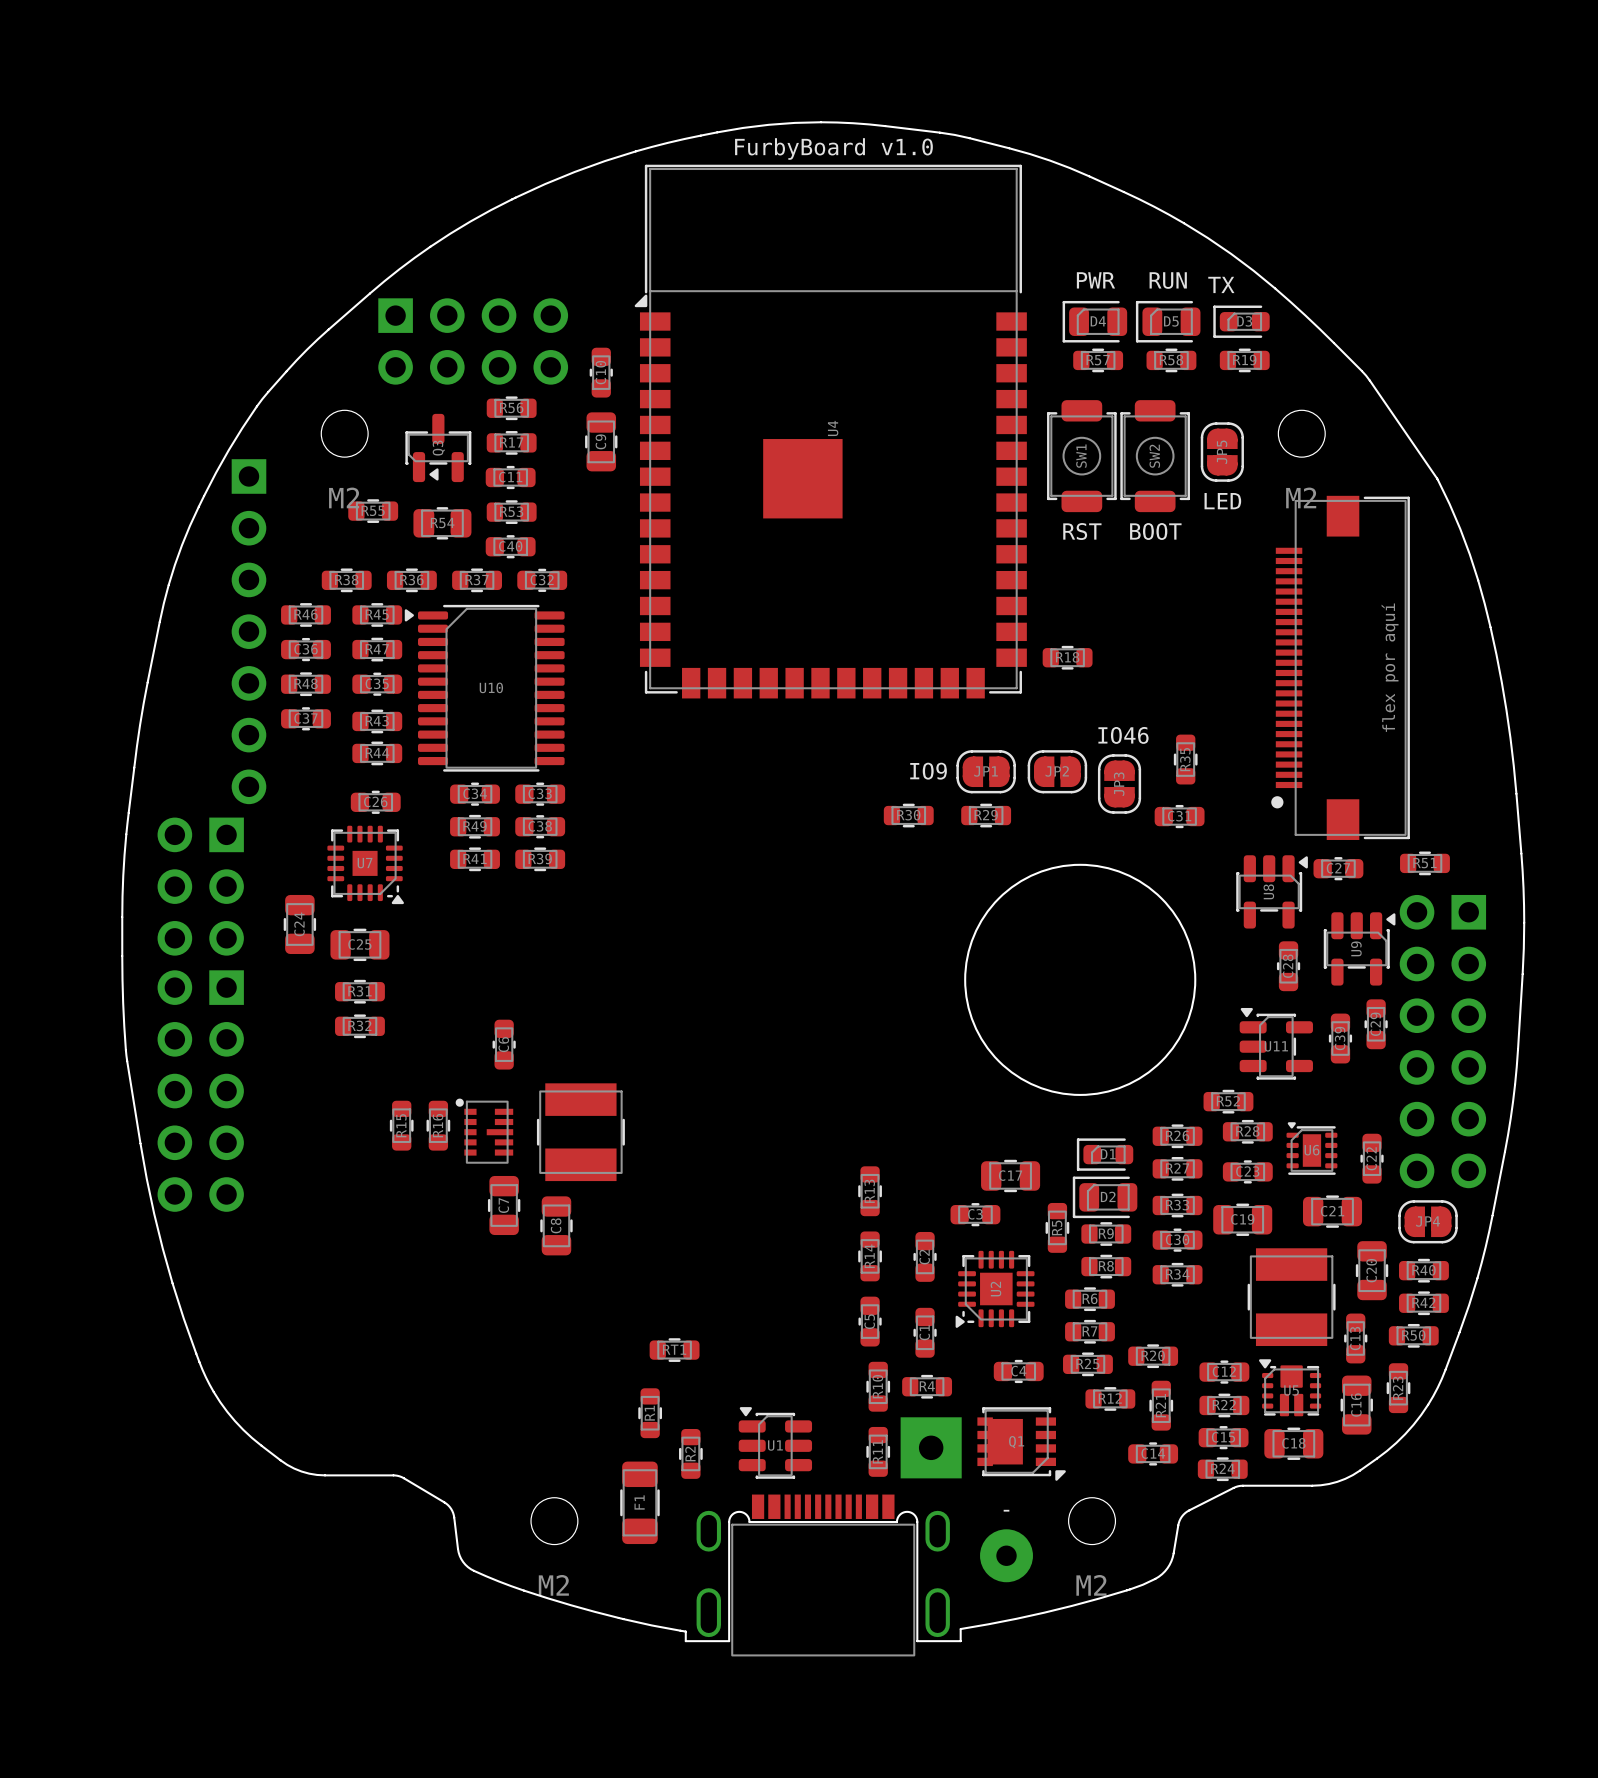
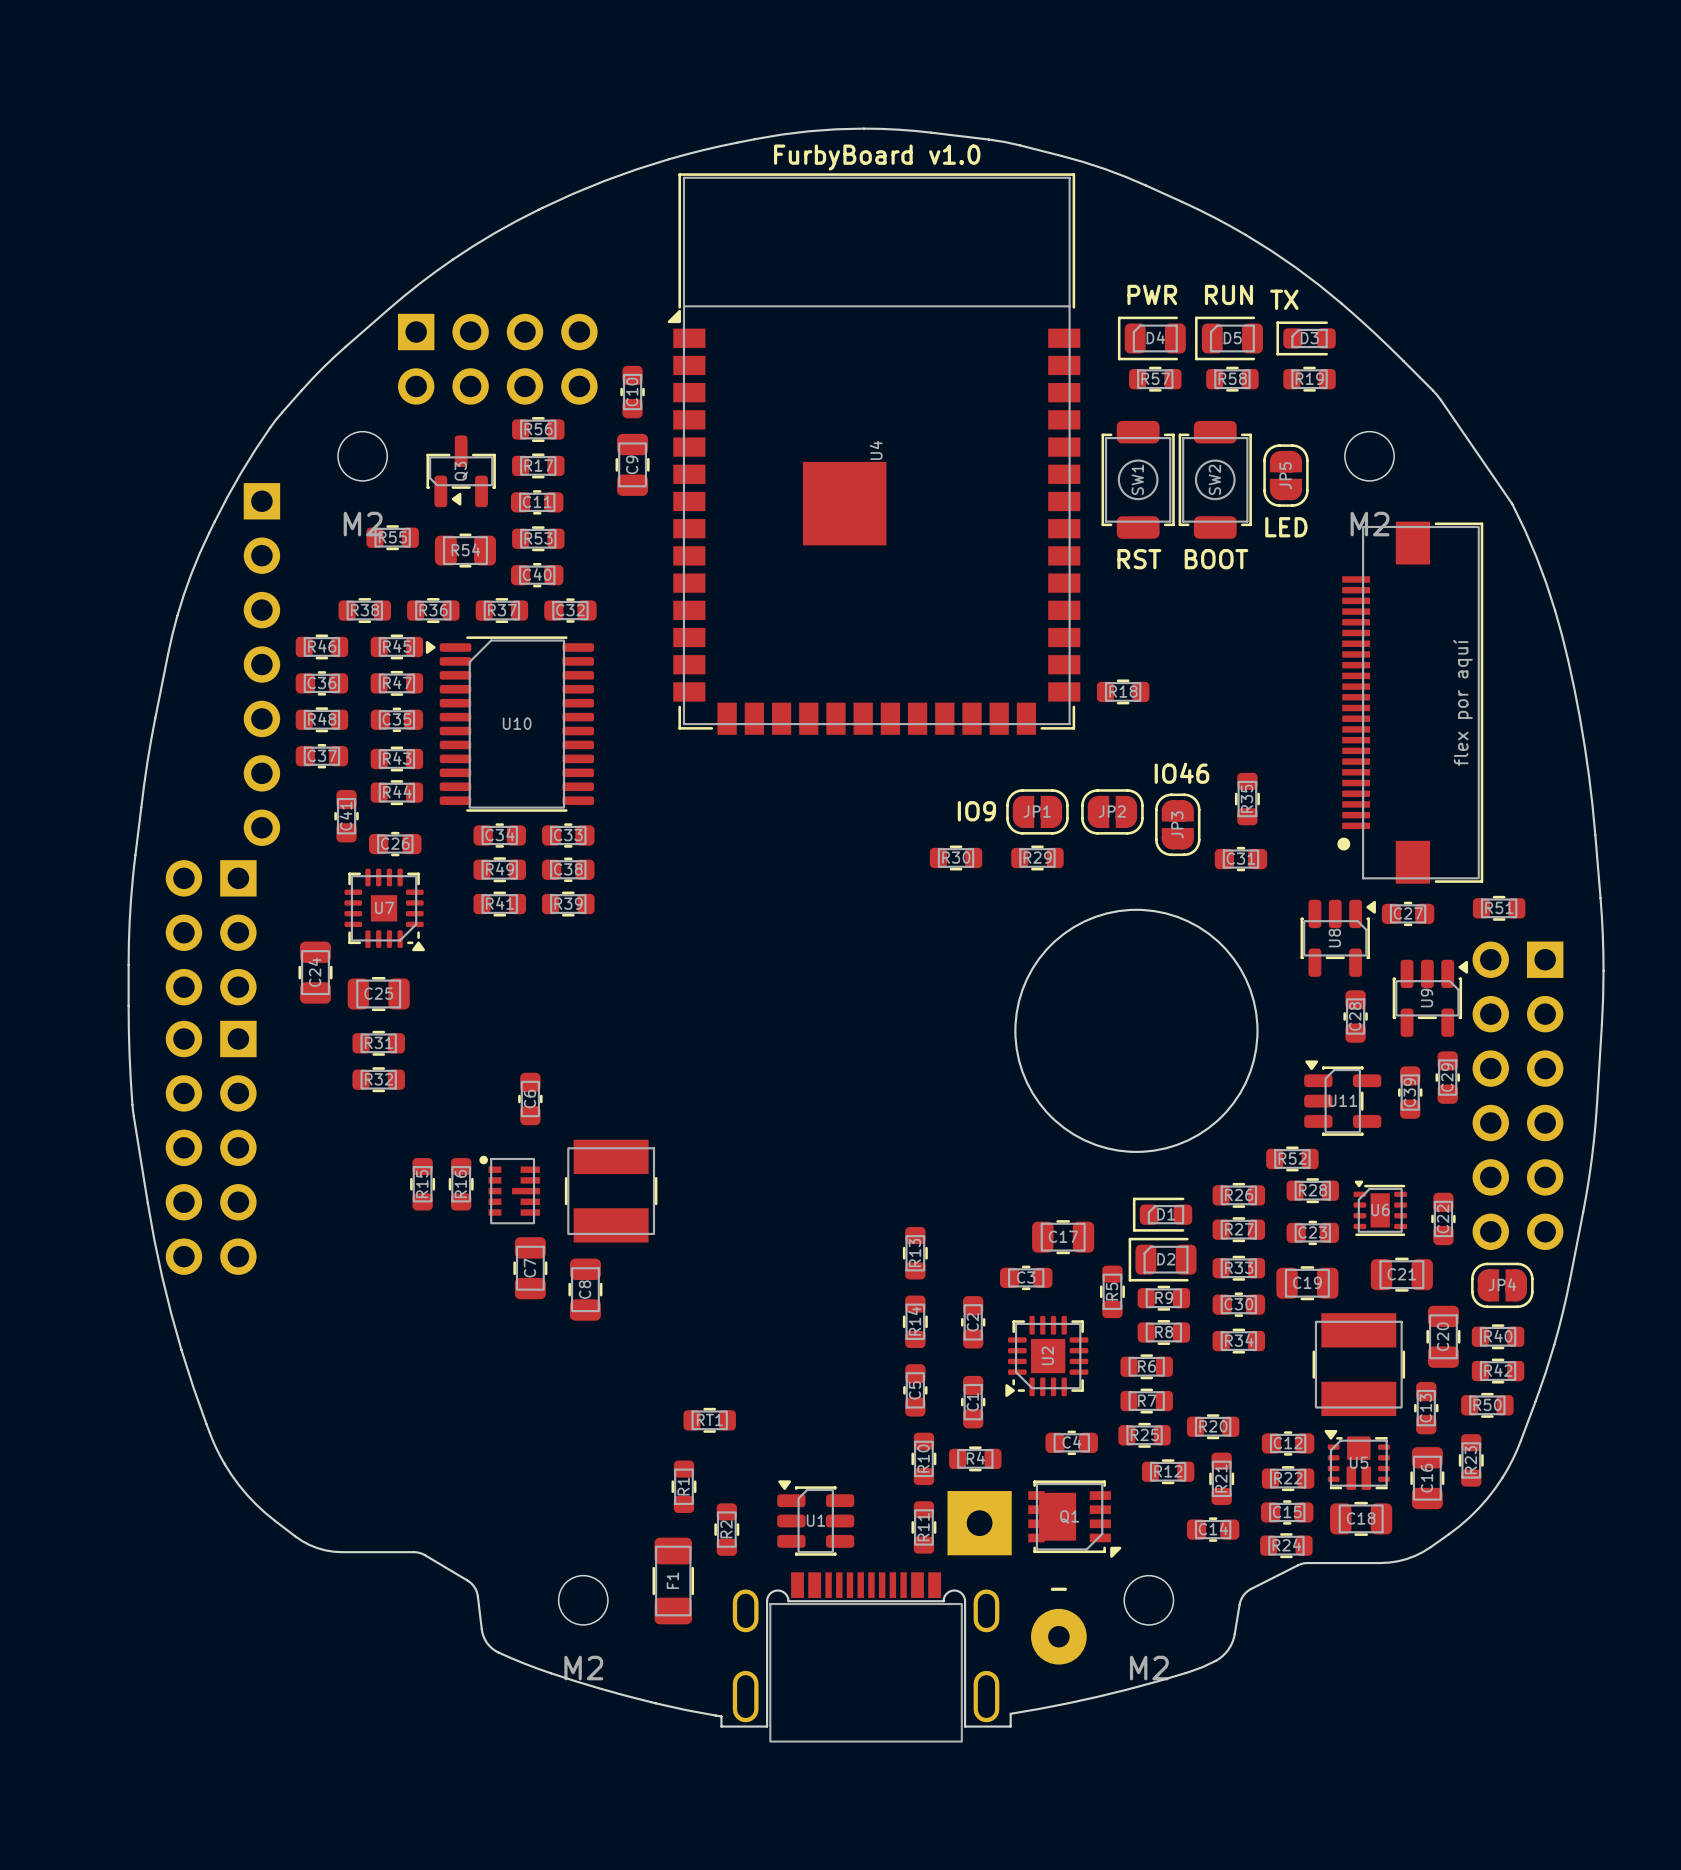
C41: none -> (346, 816)

